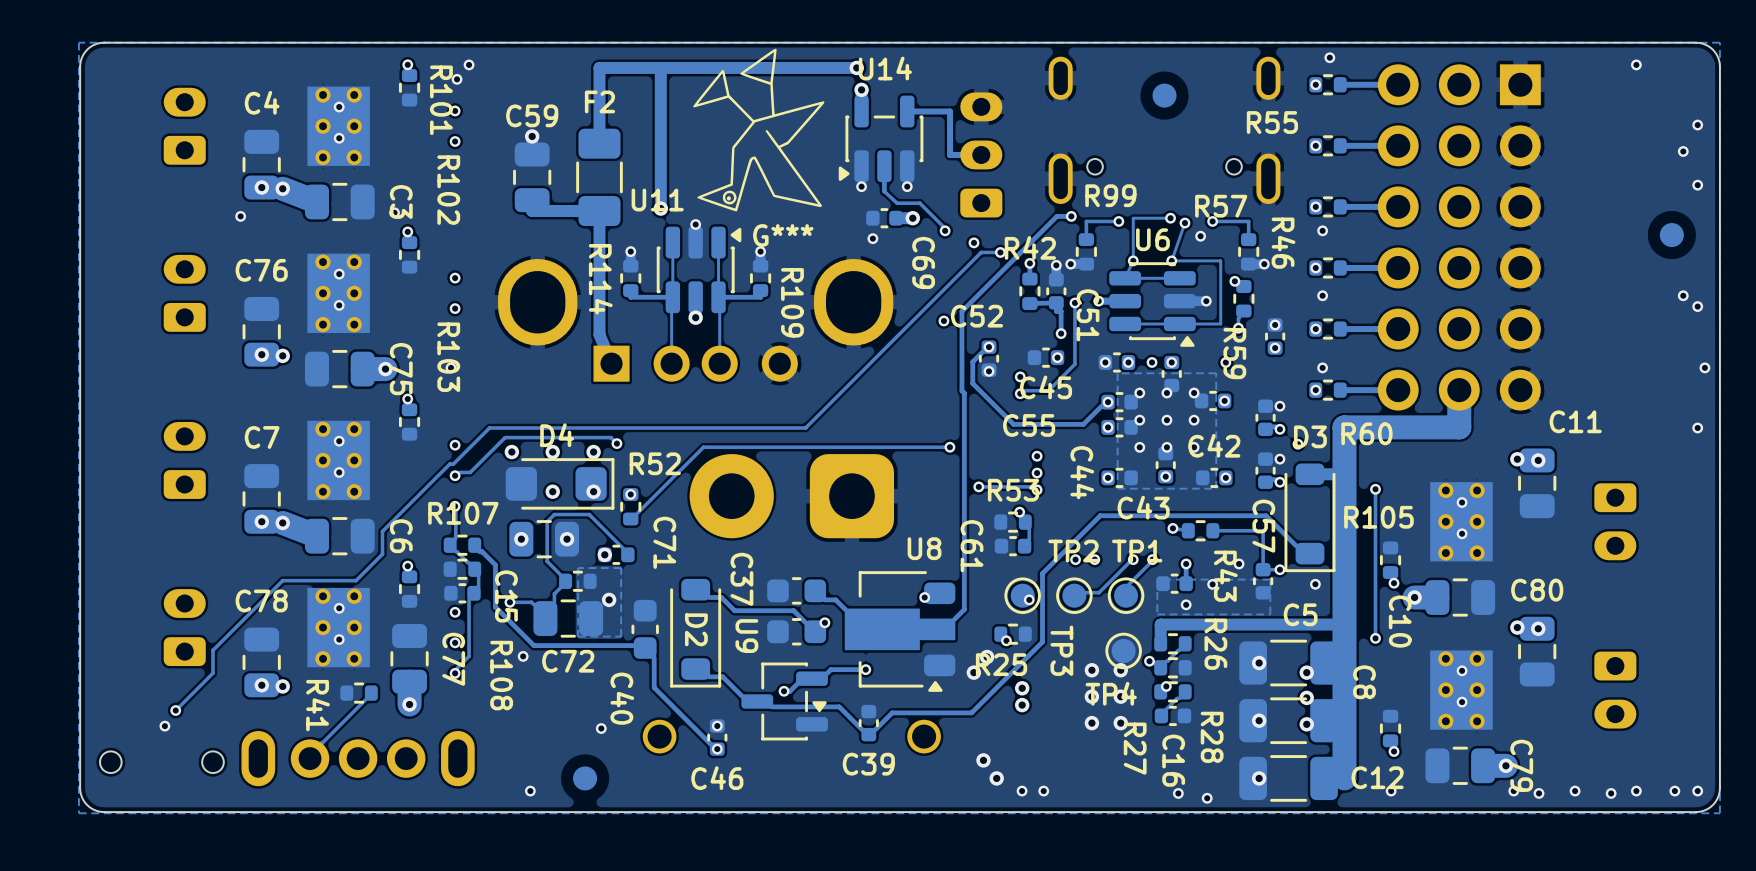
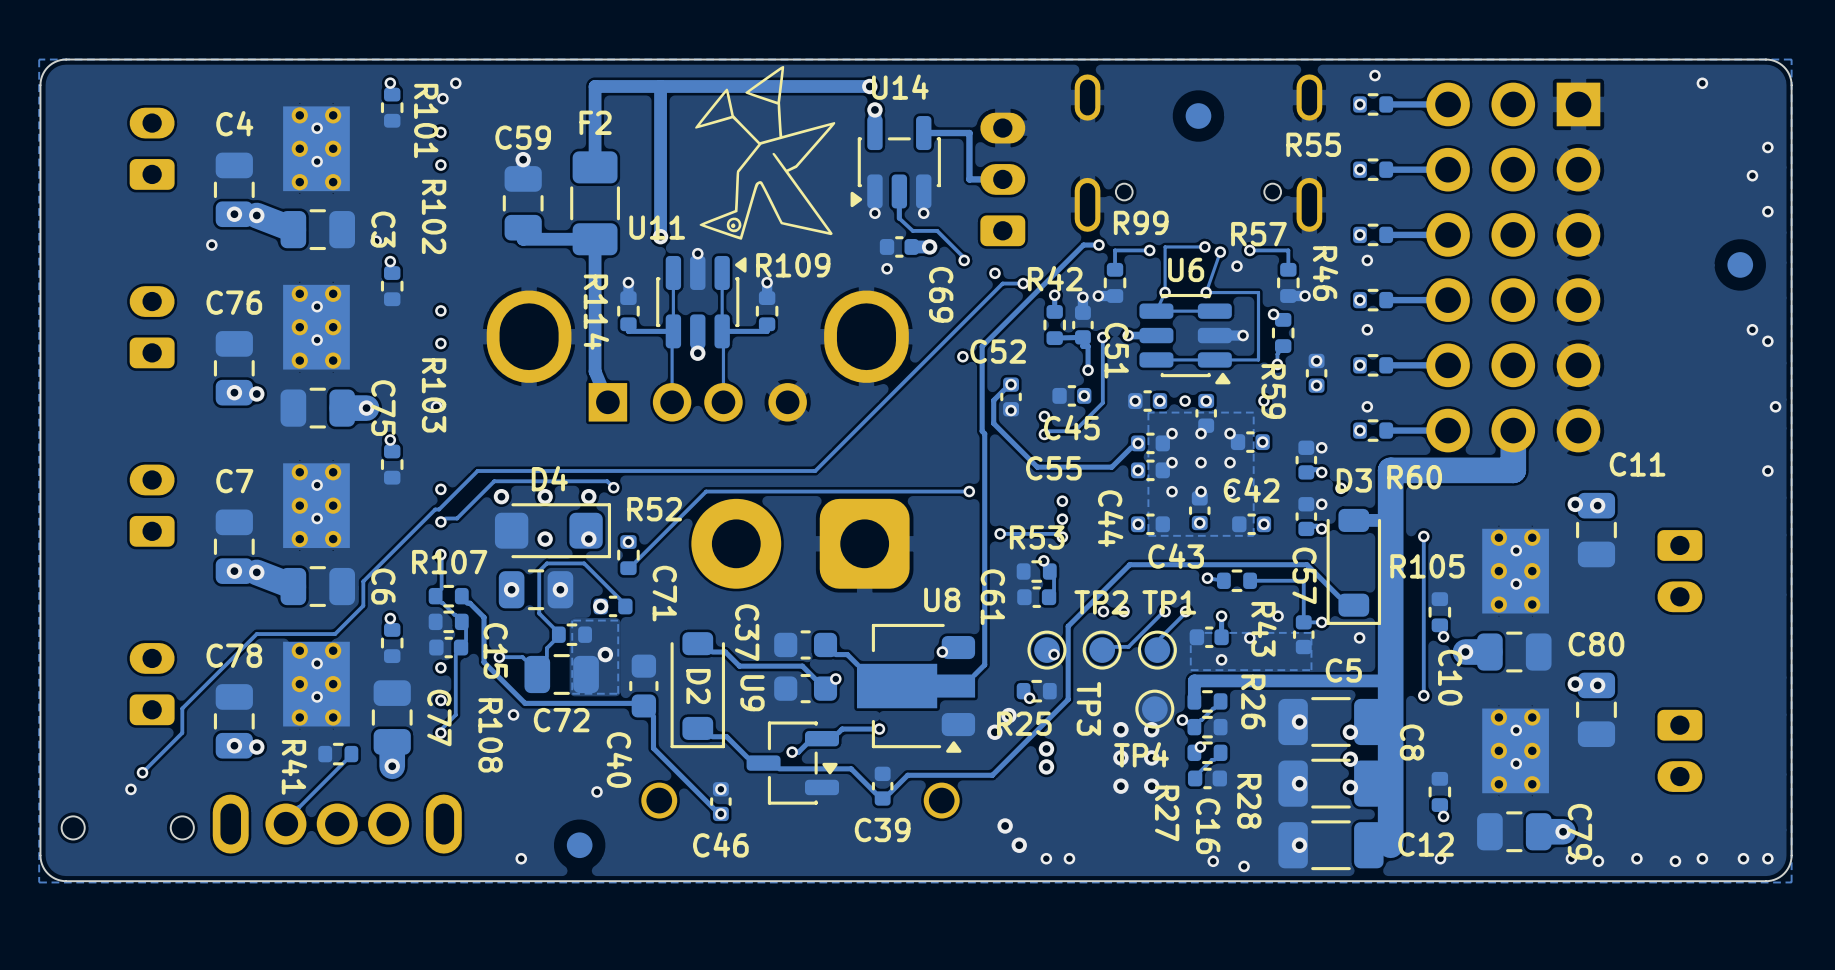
G***: (758, 130) -> none
R109 name rotation: 0° (792, 302) -> 90° counterclockwise (793, 265)

